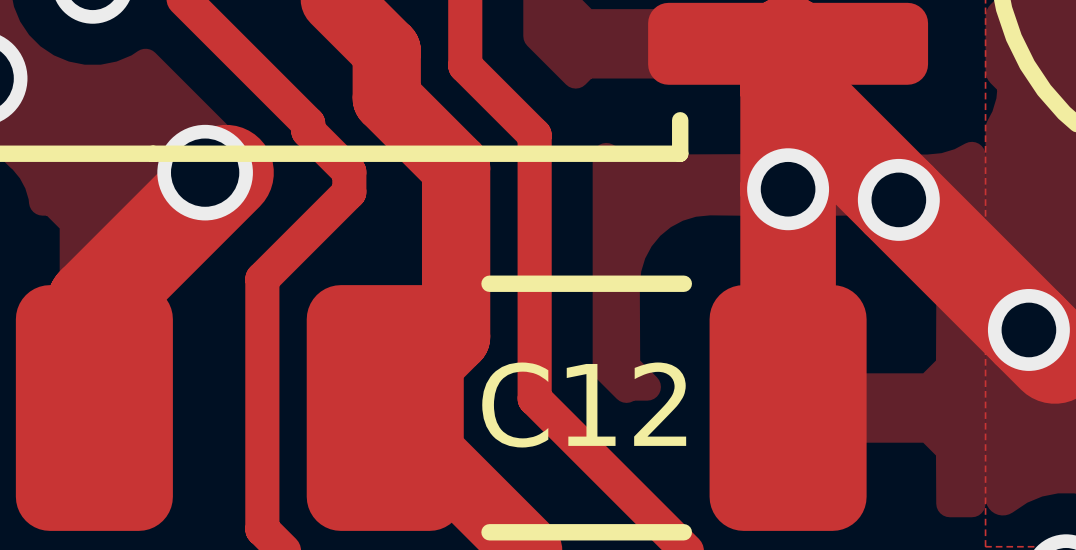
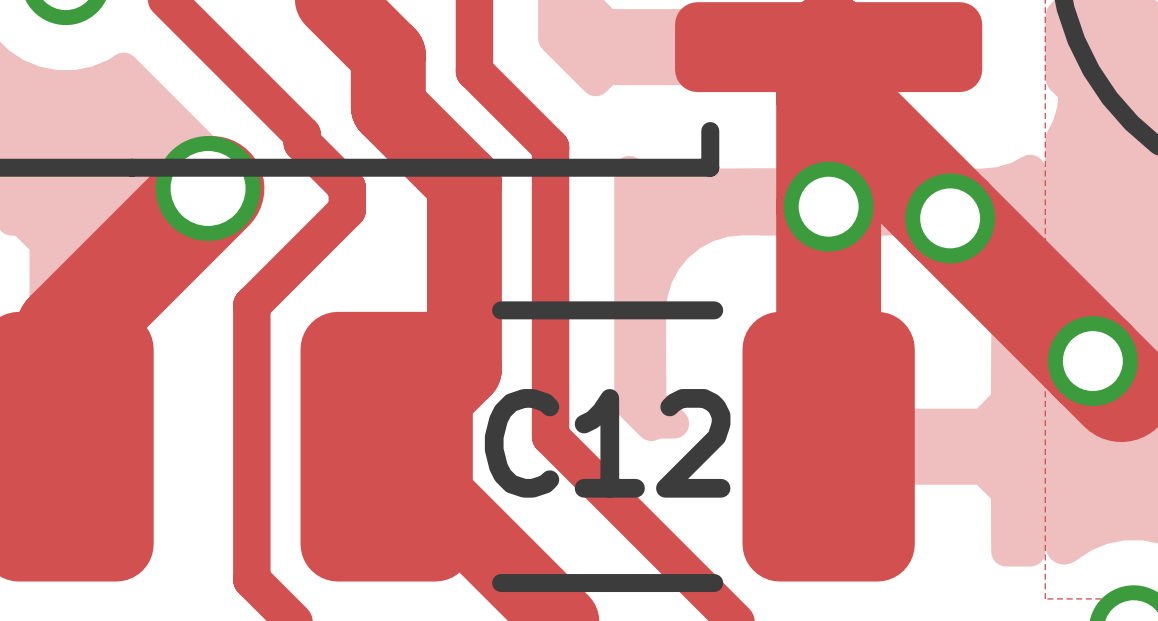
via position: (205, 172) -> (208, 188)

